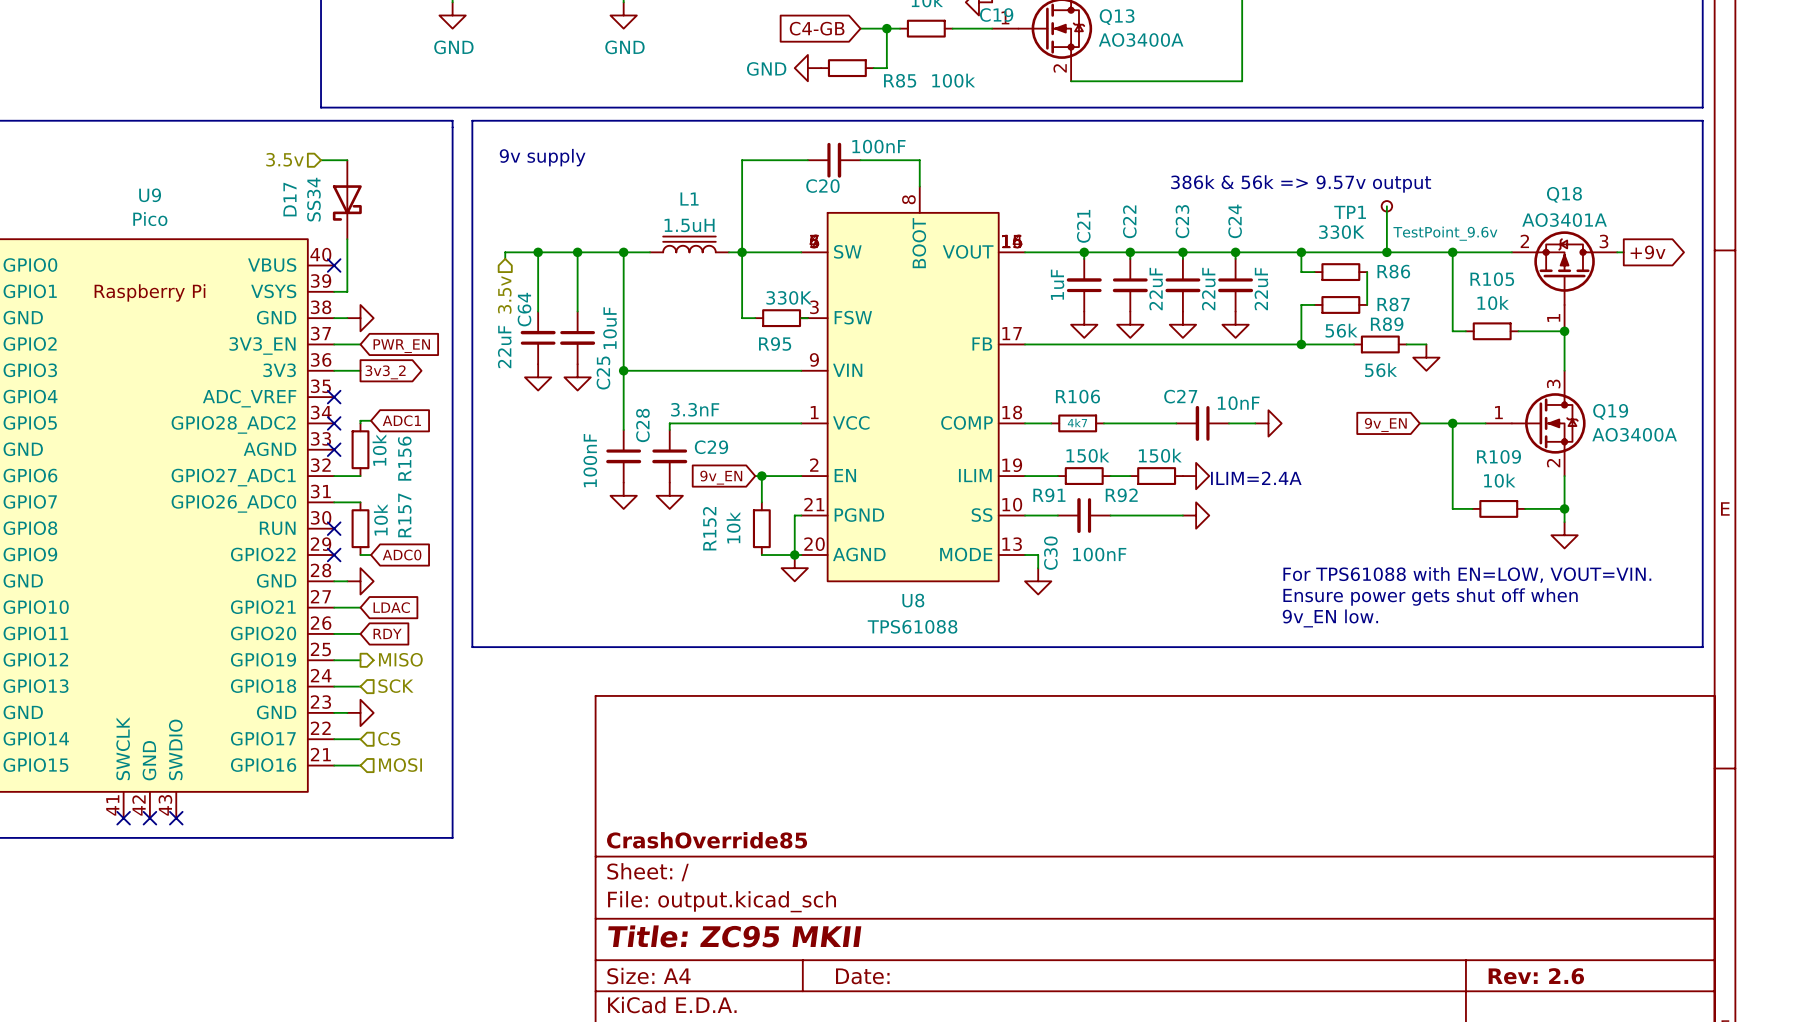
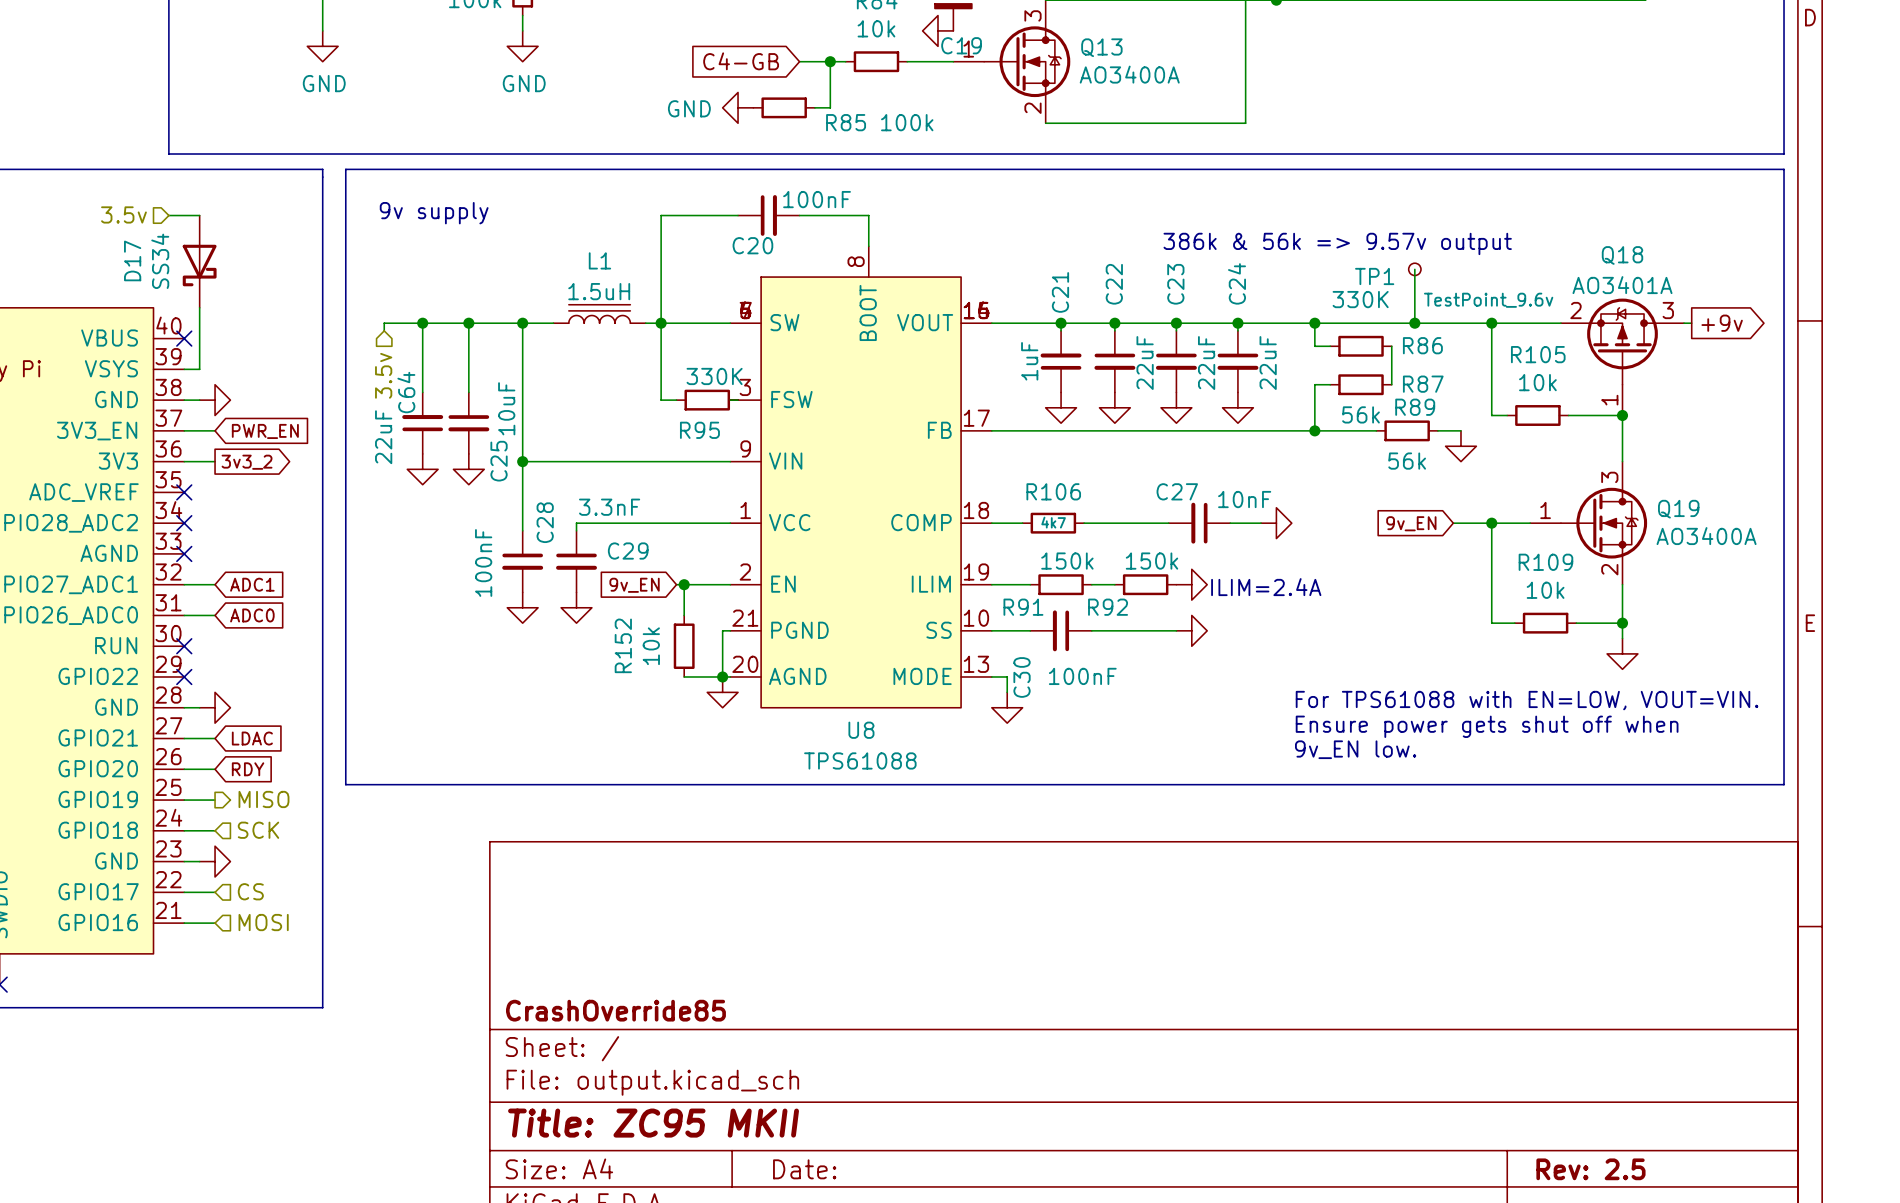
wire: (371, 420) (360, 420) (360, 423) -> none
global label position: ADC1 (401, 420) -> ADC1 (252, 584)
R156: 10k (360, 449) -> none
R157: 10k (360, 528) -> none
wire: (360, 555) (371, 555) -> none
global label position: ADC0 (402, 555) -> ADC0 (252, 615)
title block: Rev: 2.6 (1536, 976) -> Rev: 2.5 (1590, 1169)

